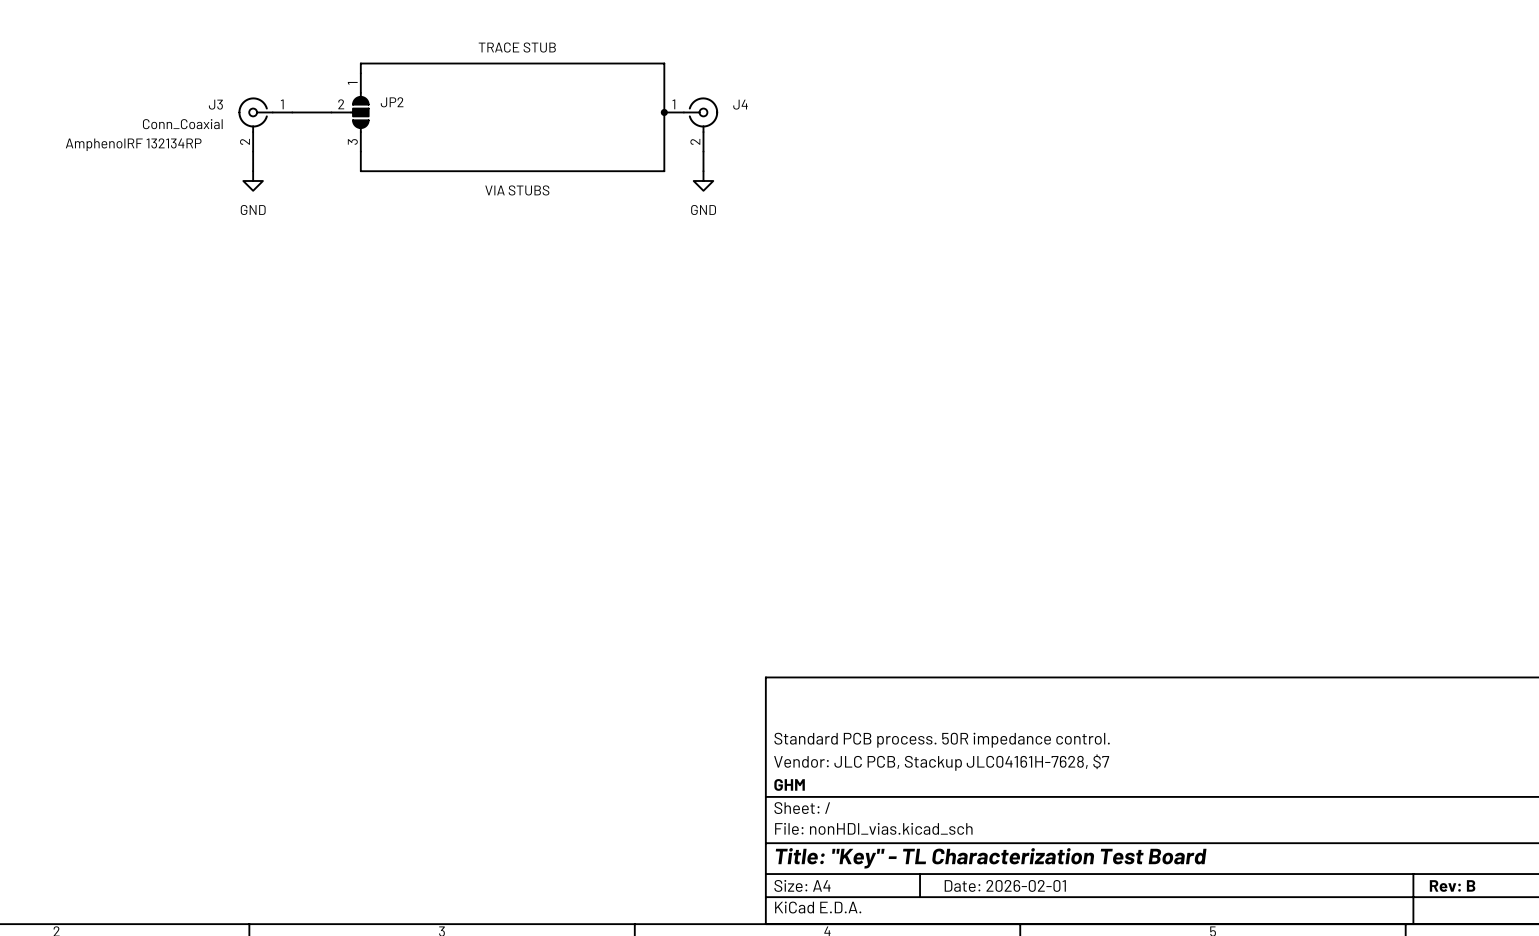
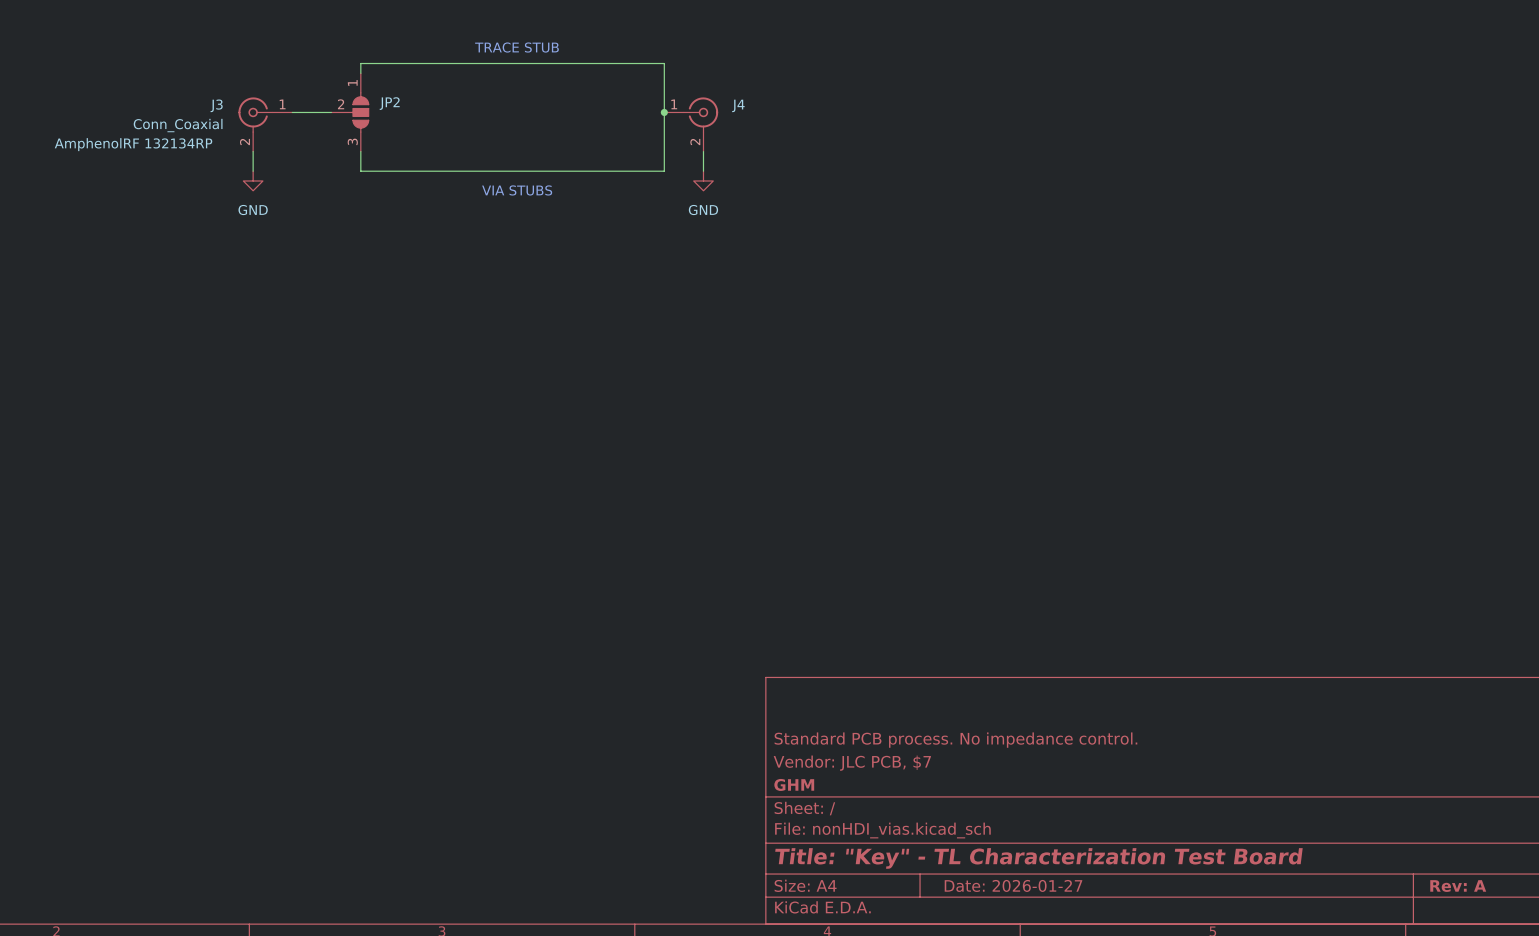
title block: Standard PCB process. 50R impedance control. (942, 740) -> Standard PCB process. No impedance control. (955, 740)
title block: Vendor: JLC PCB, Stackup JLC04161H-7628, $7 (941, 762) -> Vendor: JLC PCB, $7 (852, 763)
title block: Date: 2026-02-01 (1005, 885) -> Date: 2026-01-27 (1013, 885)
title block: Rev: B (1452, 885) -> Rev: A (1458, 886)

